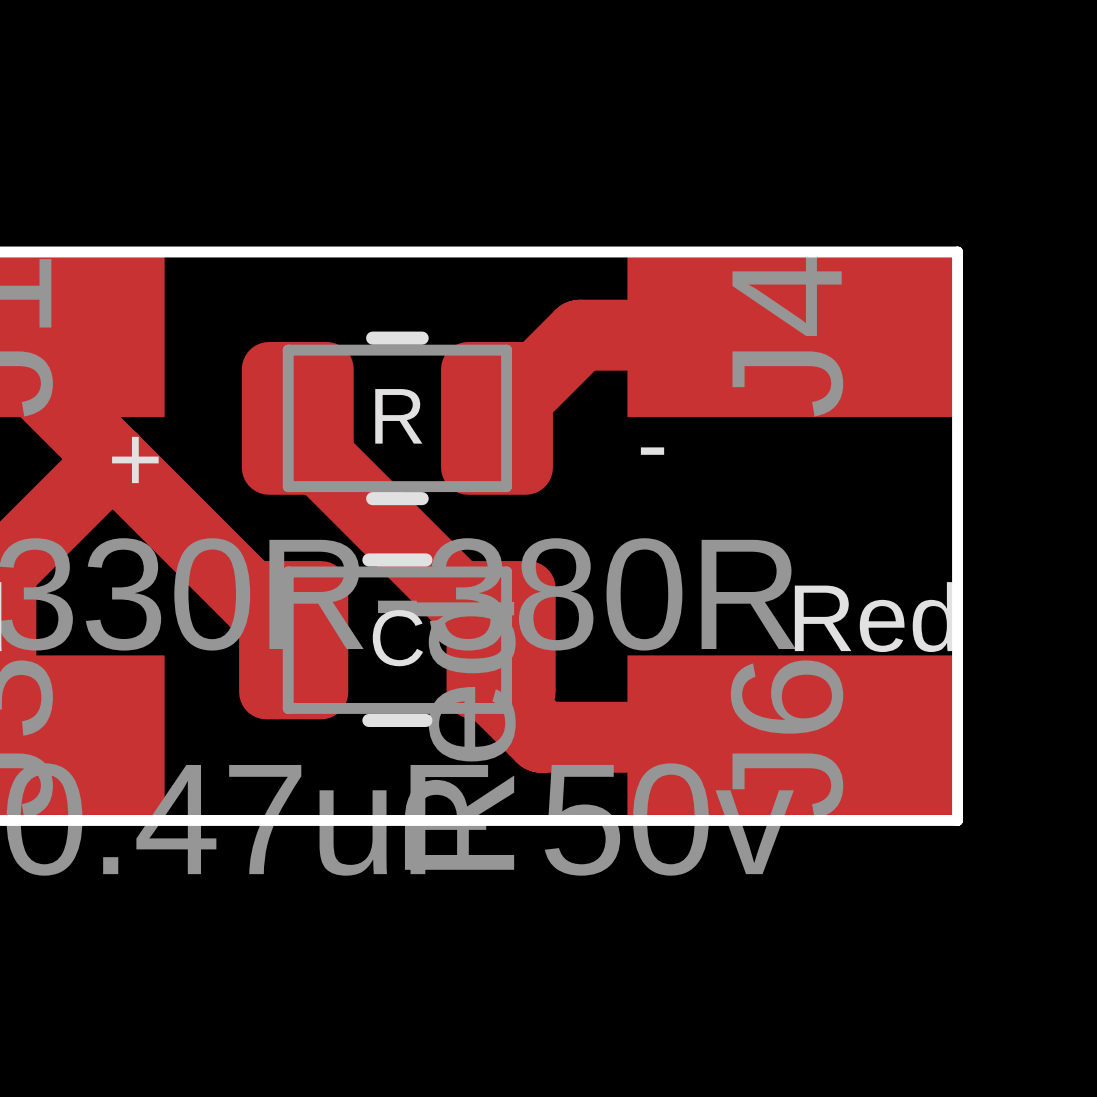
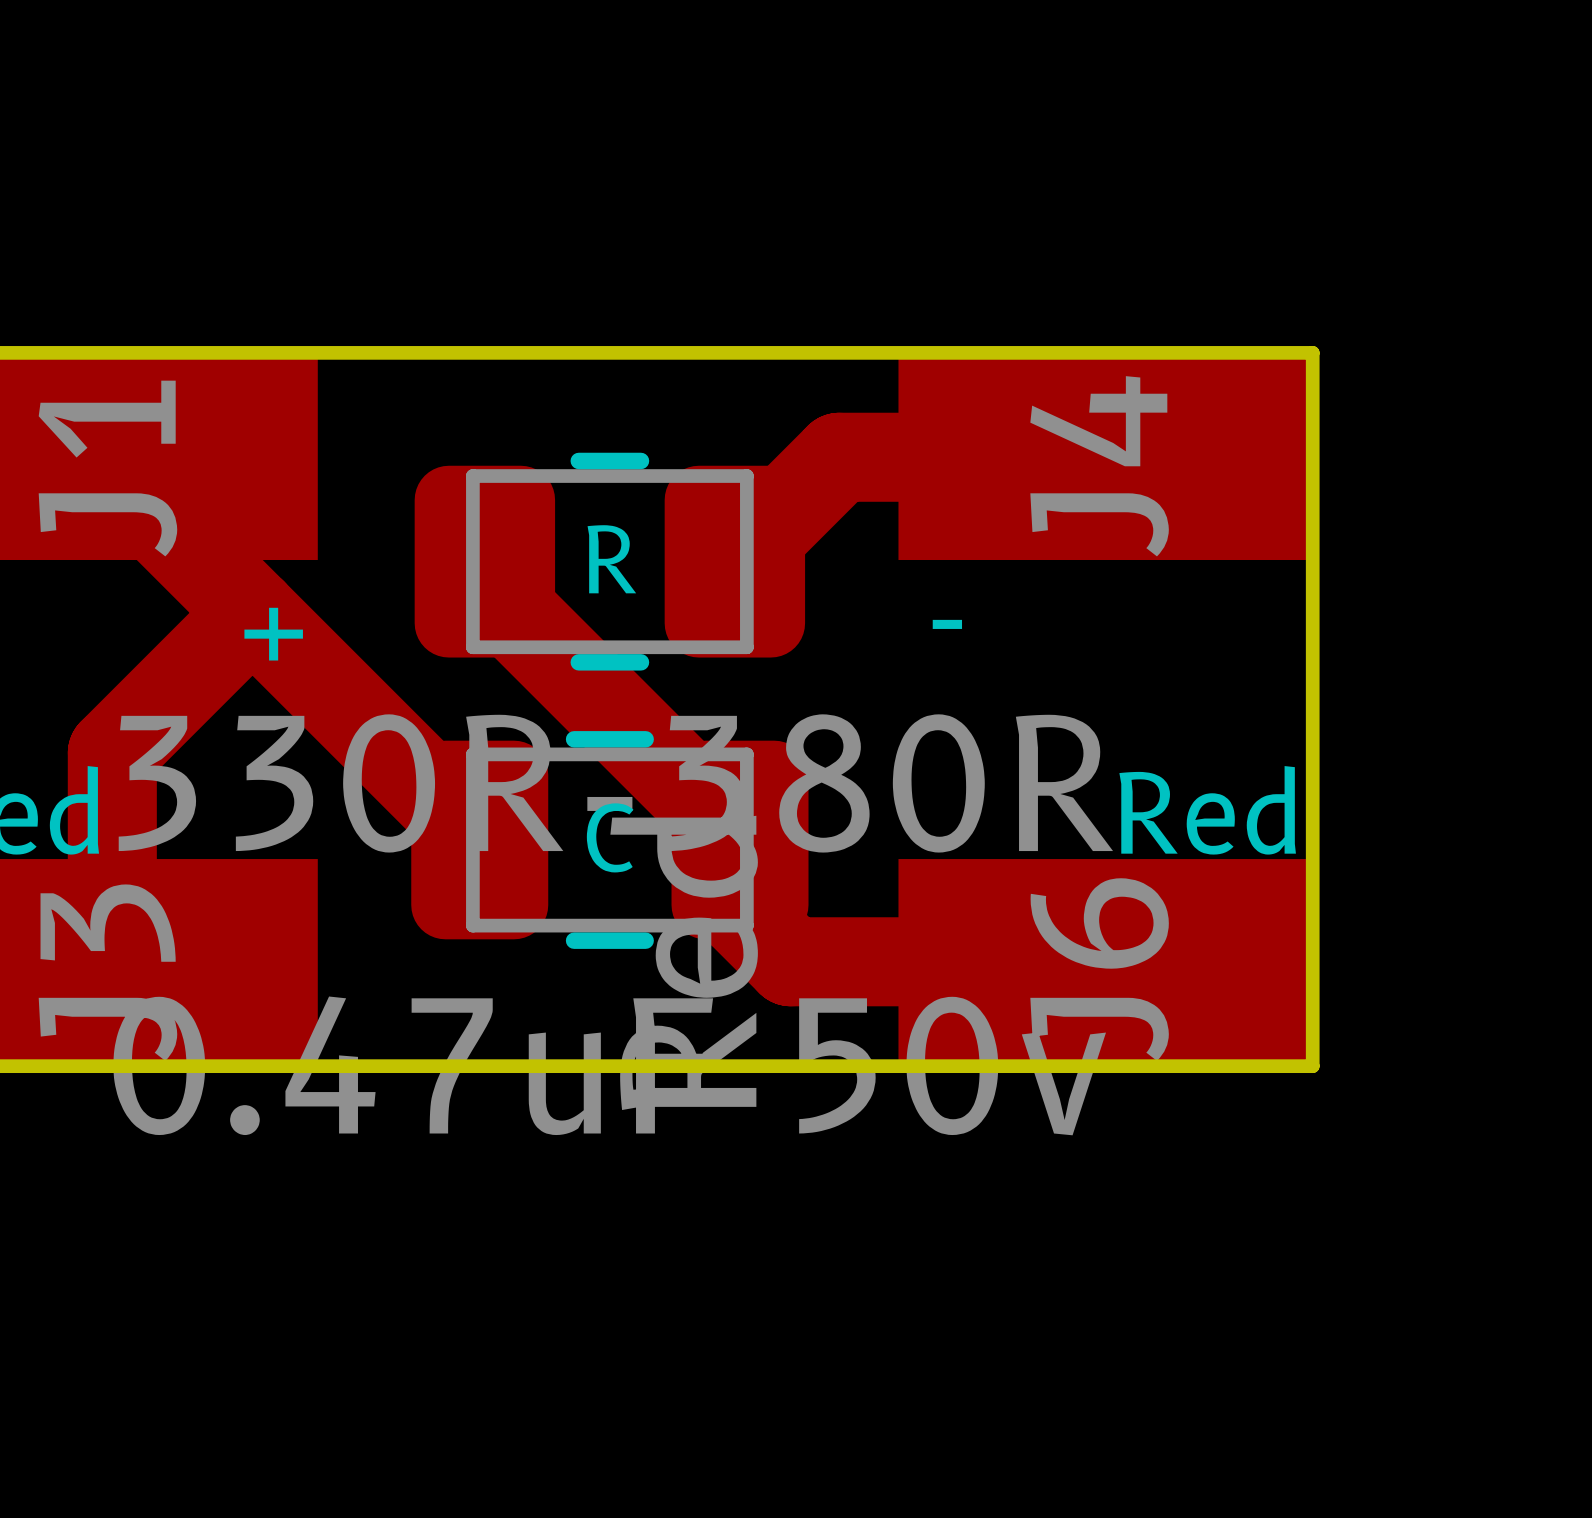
J4 value position: - (652, 451) -> - (947, 624)
J1 value position: + (135, 459) -> + (273, 634)

